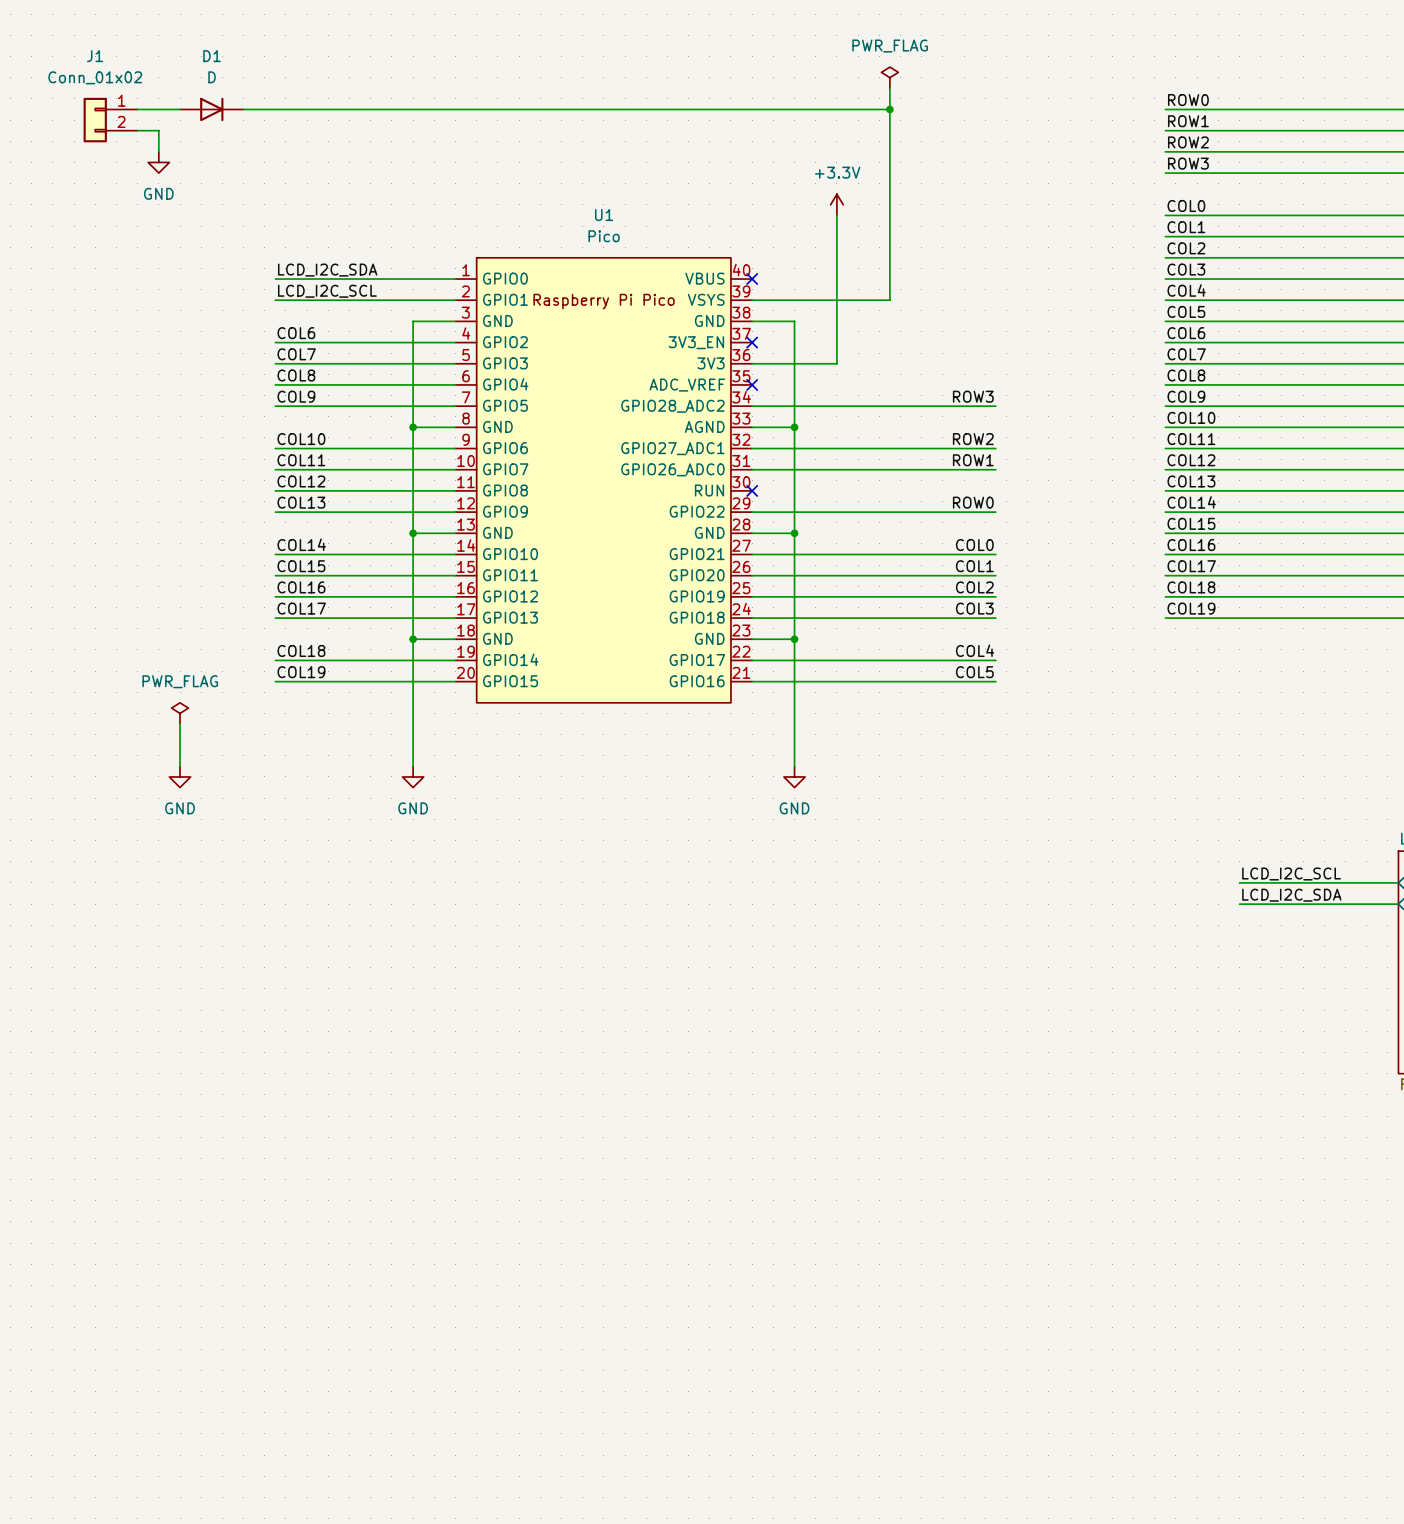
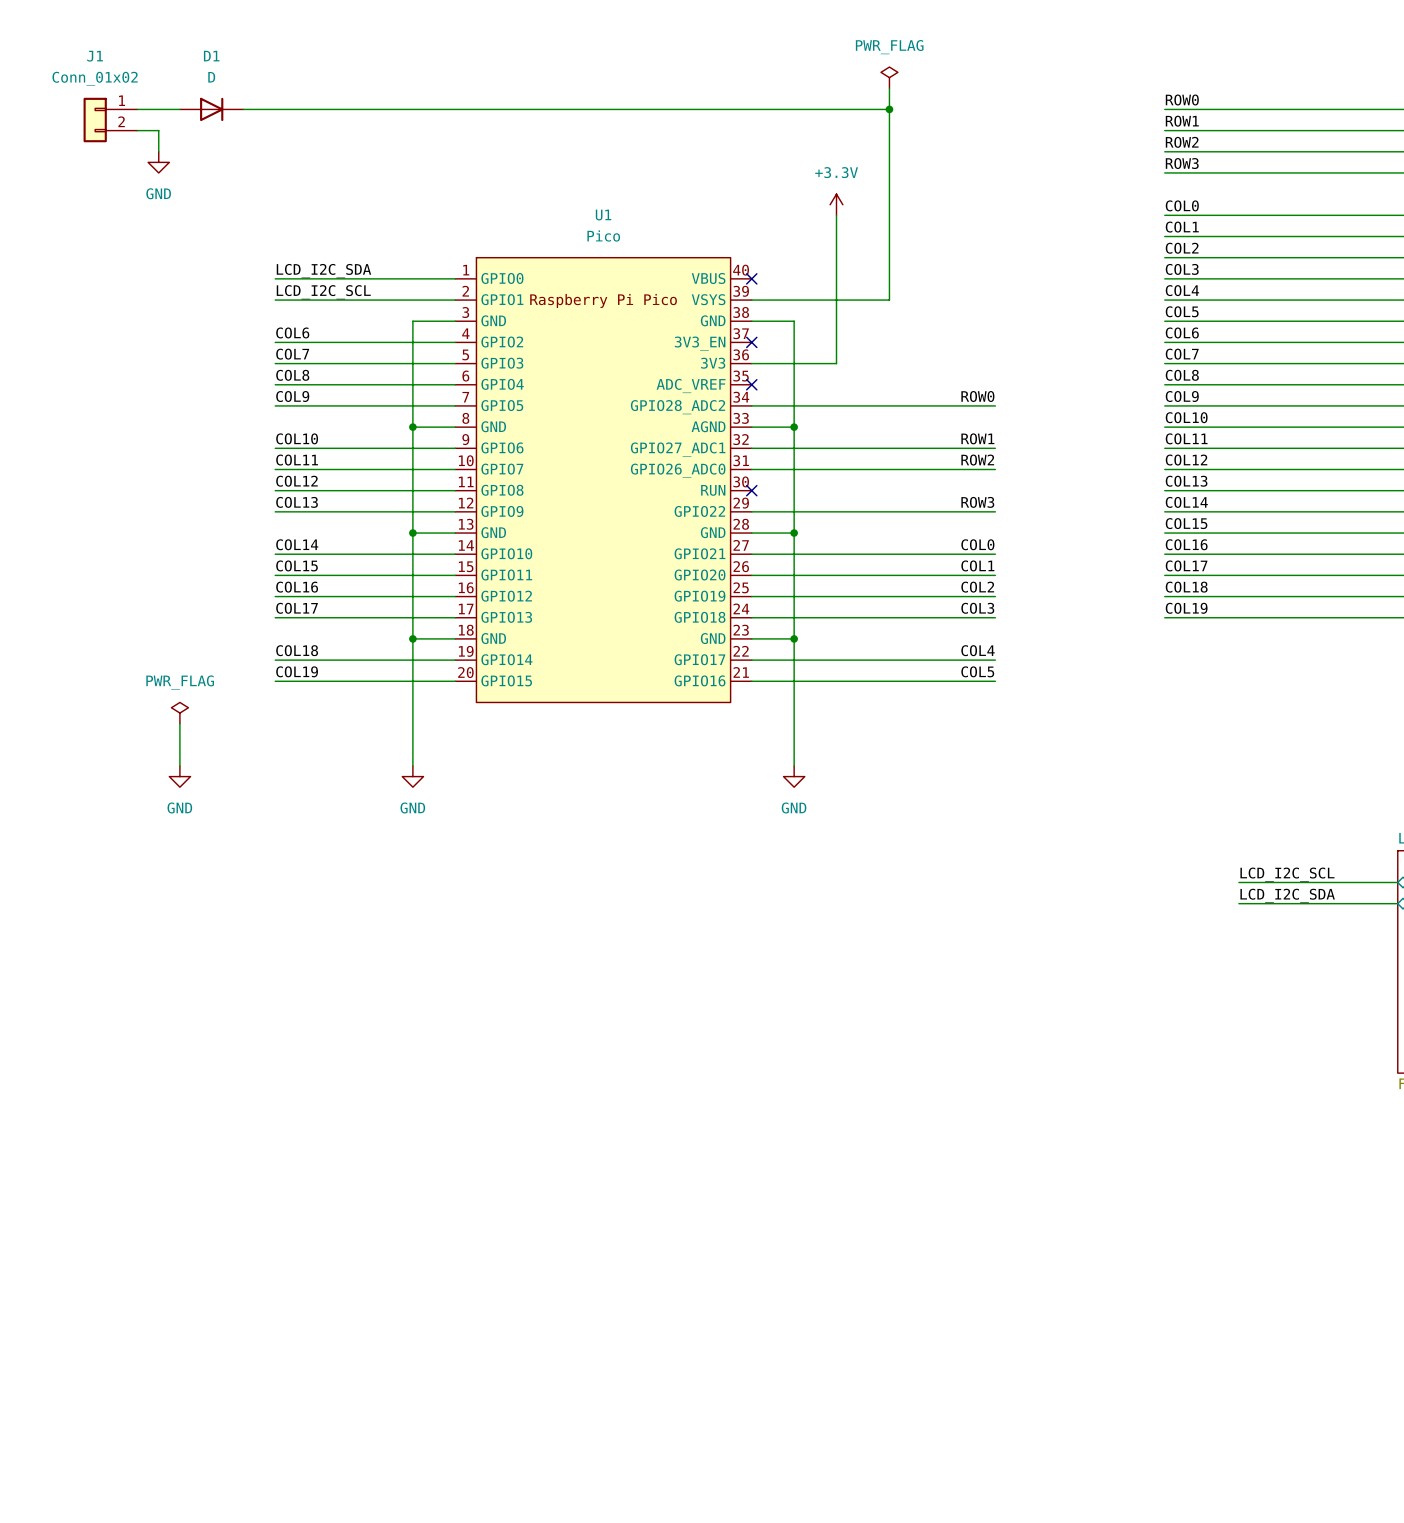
label: ROW3 (973, 396) -> ROW0 (977, 396)
label: ROW2 (973, 439) -> ROW1 (977, 438)
label: ROW1 (973, 460) -> ROW2 (977, 460)
label: ROW0 (973, 502) -> ROW3 (977, 502)

